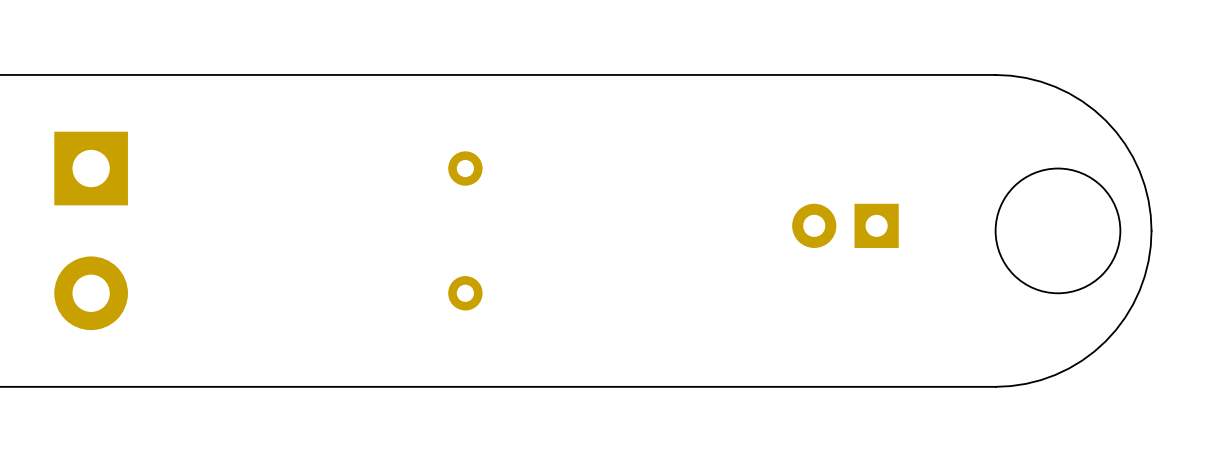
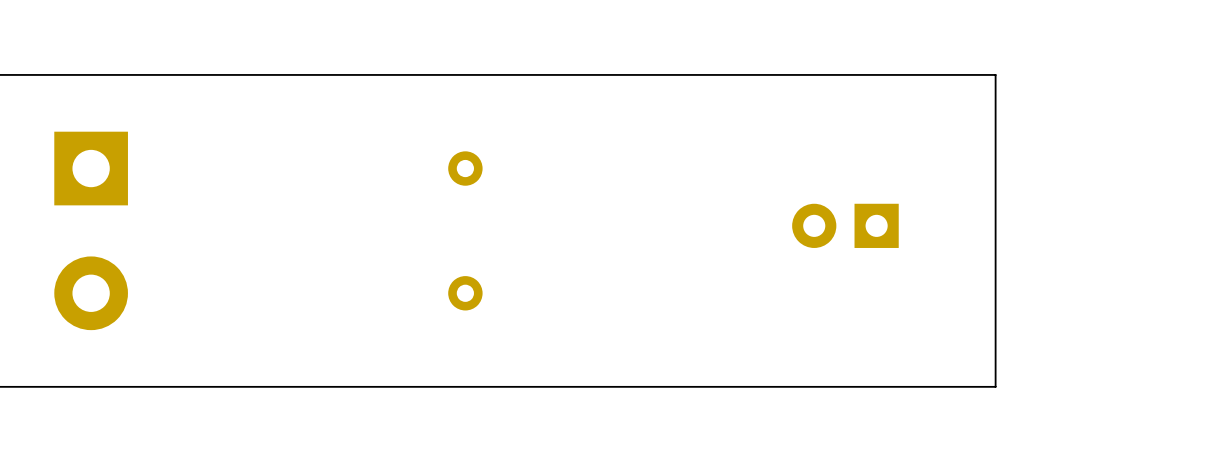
board edge: (995, 74) (1026, 77) (1055, 86) (1082, 101) (1105, 120) (1125, 144) (1139, 171) (1148, 200) (1151, 230) (1148, 261) (1139, 290) (1125, 317) (1105, 341) (1082, 360) (1055, 374) (1026, 383) (995, 386) -> (995, 74) (995, 386)
round board edge: [994, 167, 1121, 294] -> none

